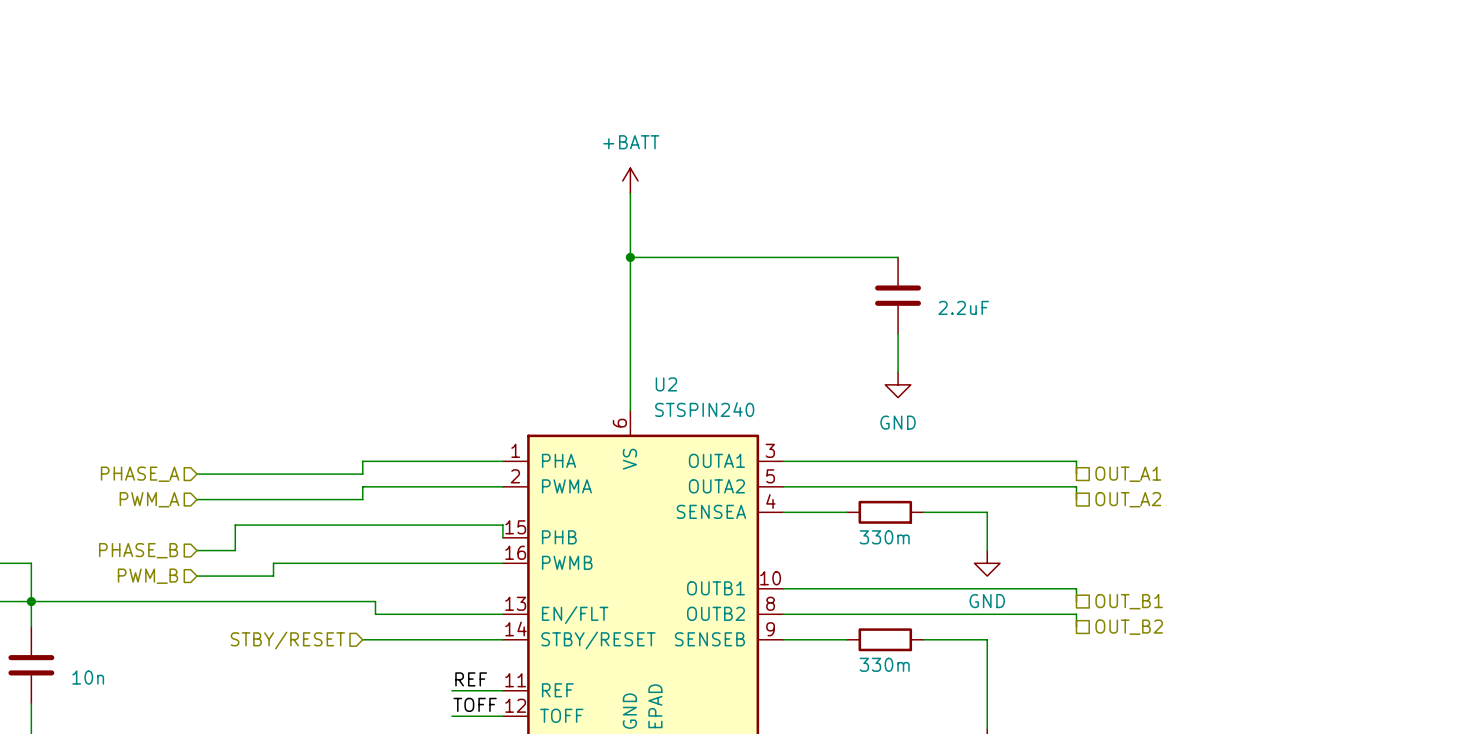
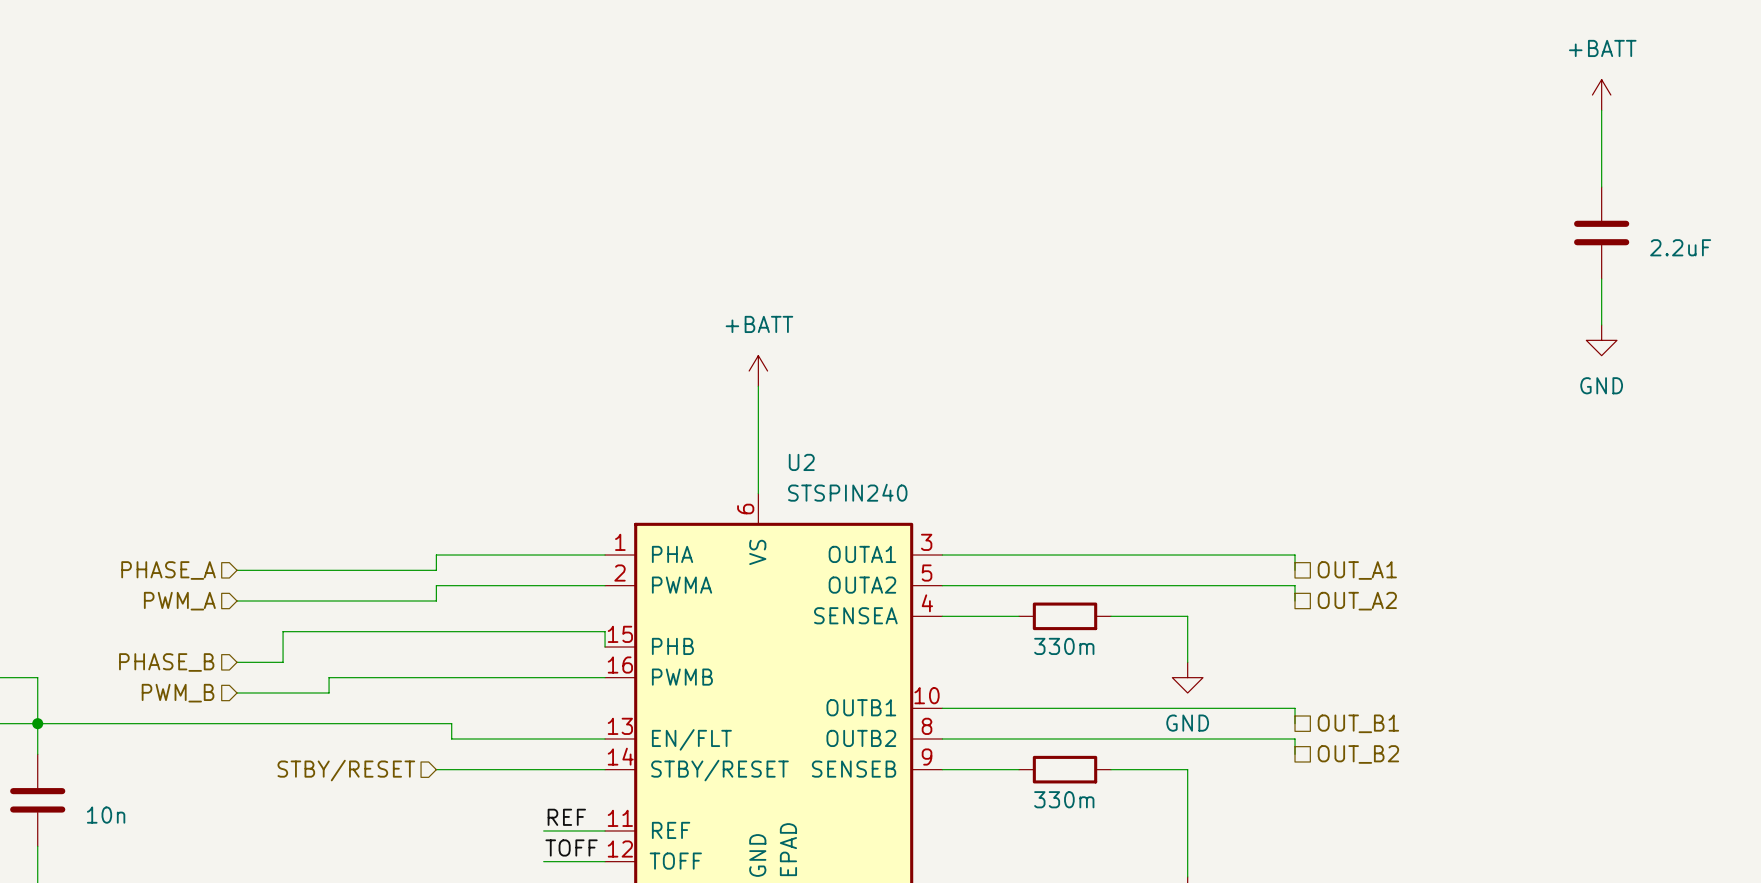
power symbol: none -> +BATT (1601, 95)
wire: none -> (1601, 110) (1601, 187)
power symbol position: +BATT (630, 180) -> +BATT (758, 371)
wire: (630, 193) (630, 321) -> none
part: none -> 2.2uF (1601, 233)
wire: none -> (1601, 279) (1601, 325)
wire: (630, 257) (898, 257) -> none
junction: (630, 257) -> none
power symbol: none -> GND (1601, 340)
part: 2.2uF (898, 295) -> none
wire: (898, 333) (898, 372) -> none
power symbol: GND (898, 384) -> none

